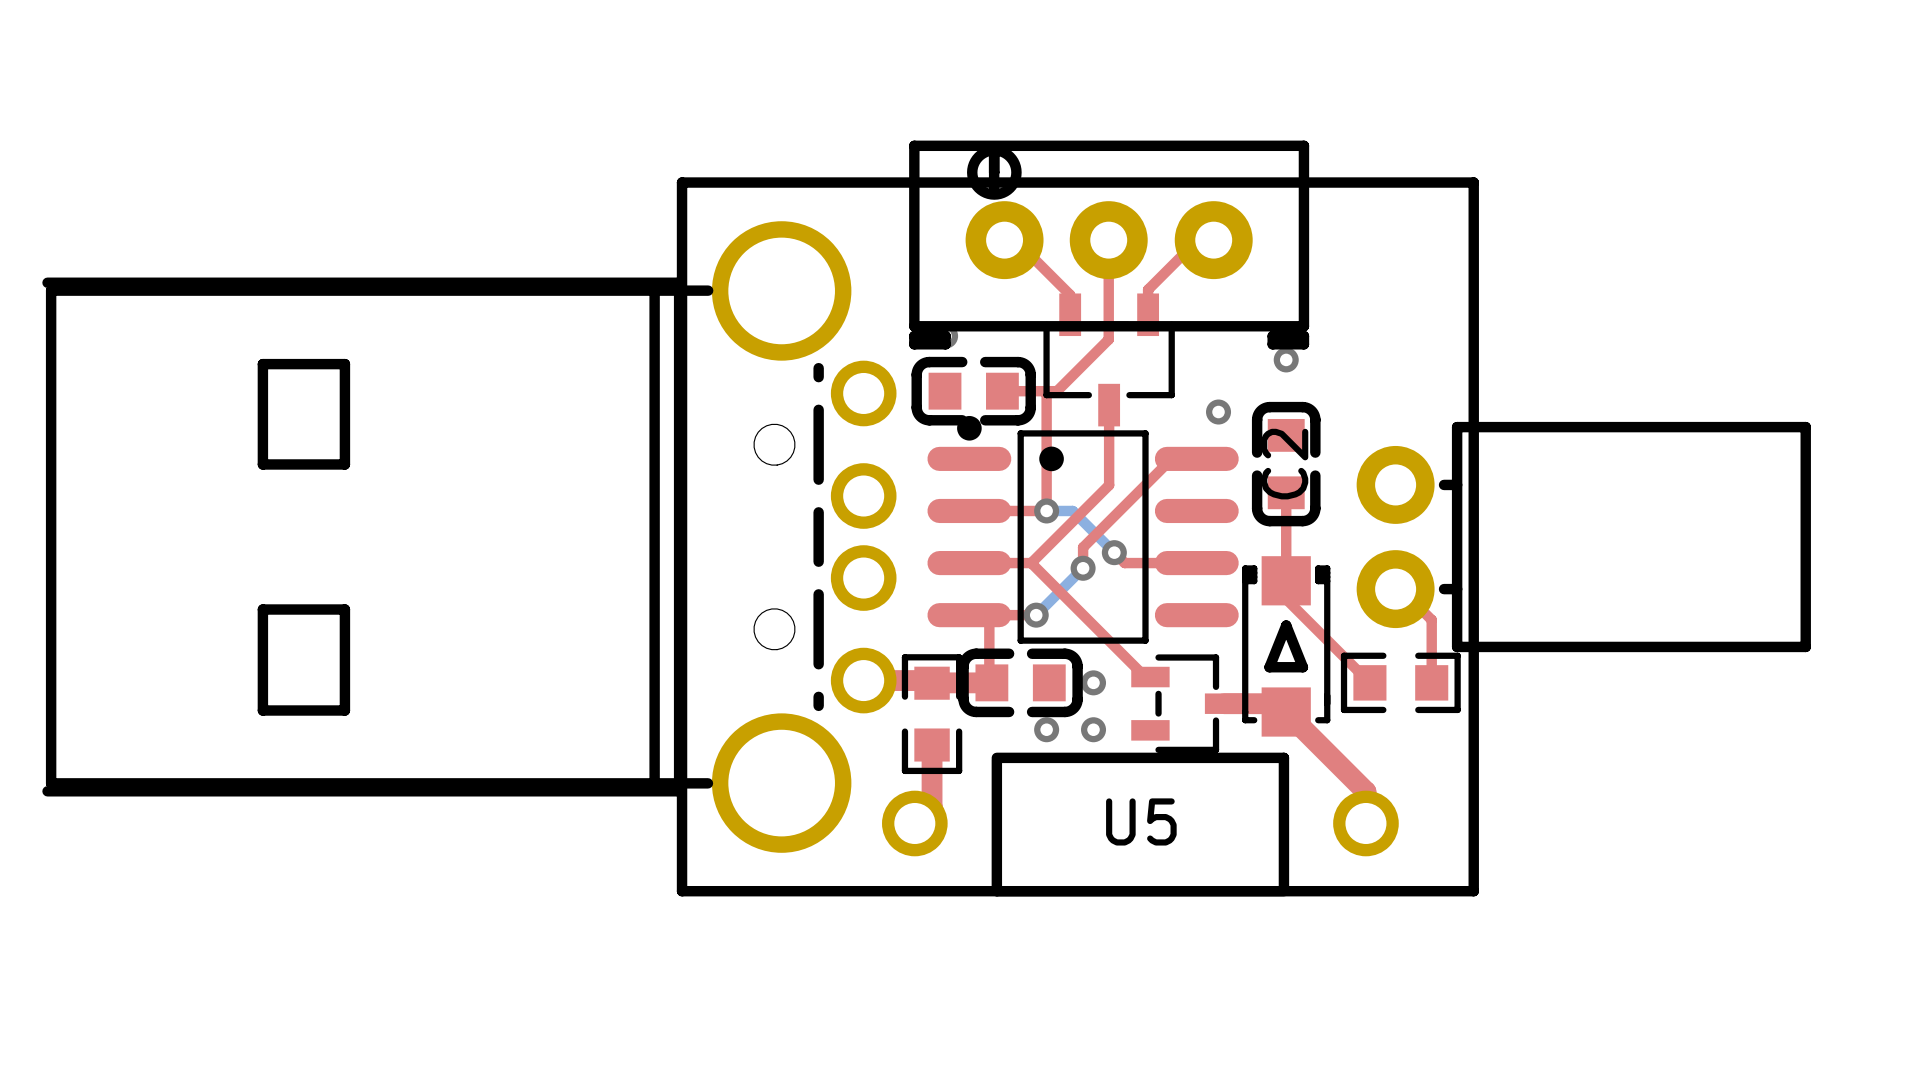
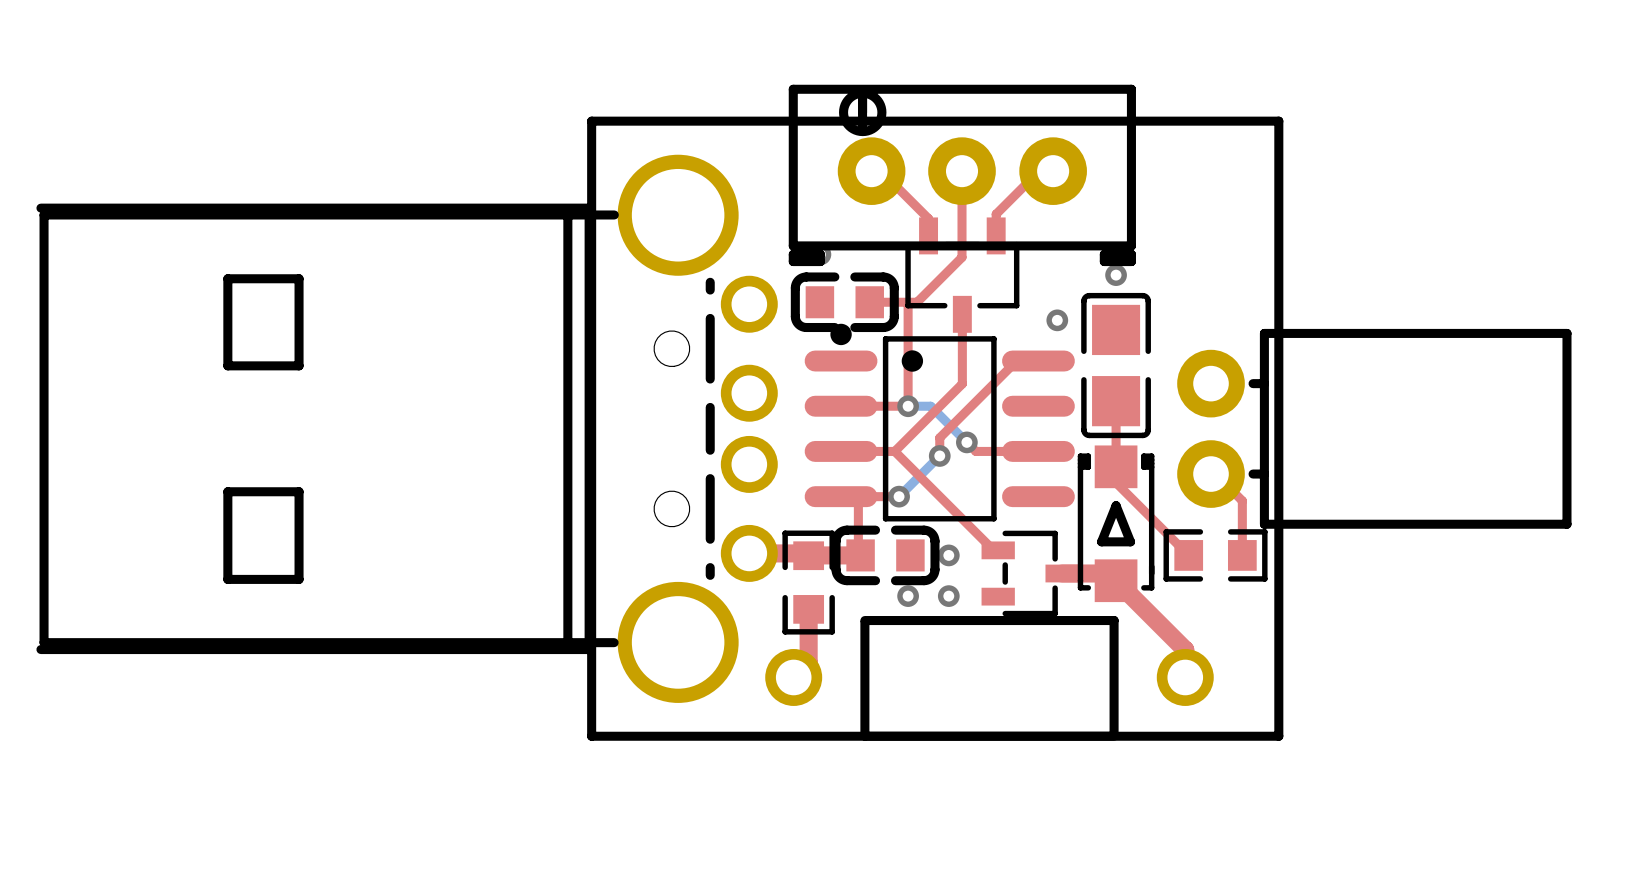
C2: (1286, 464) -> none
part: none -> (1116, 365)
U5 name: U5 (1141, 821) -> none

